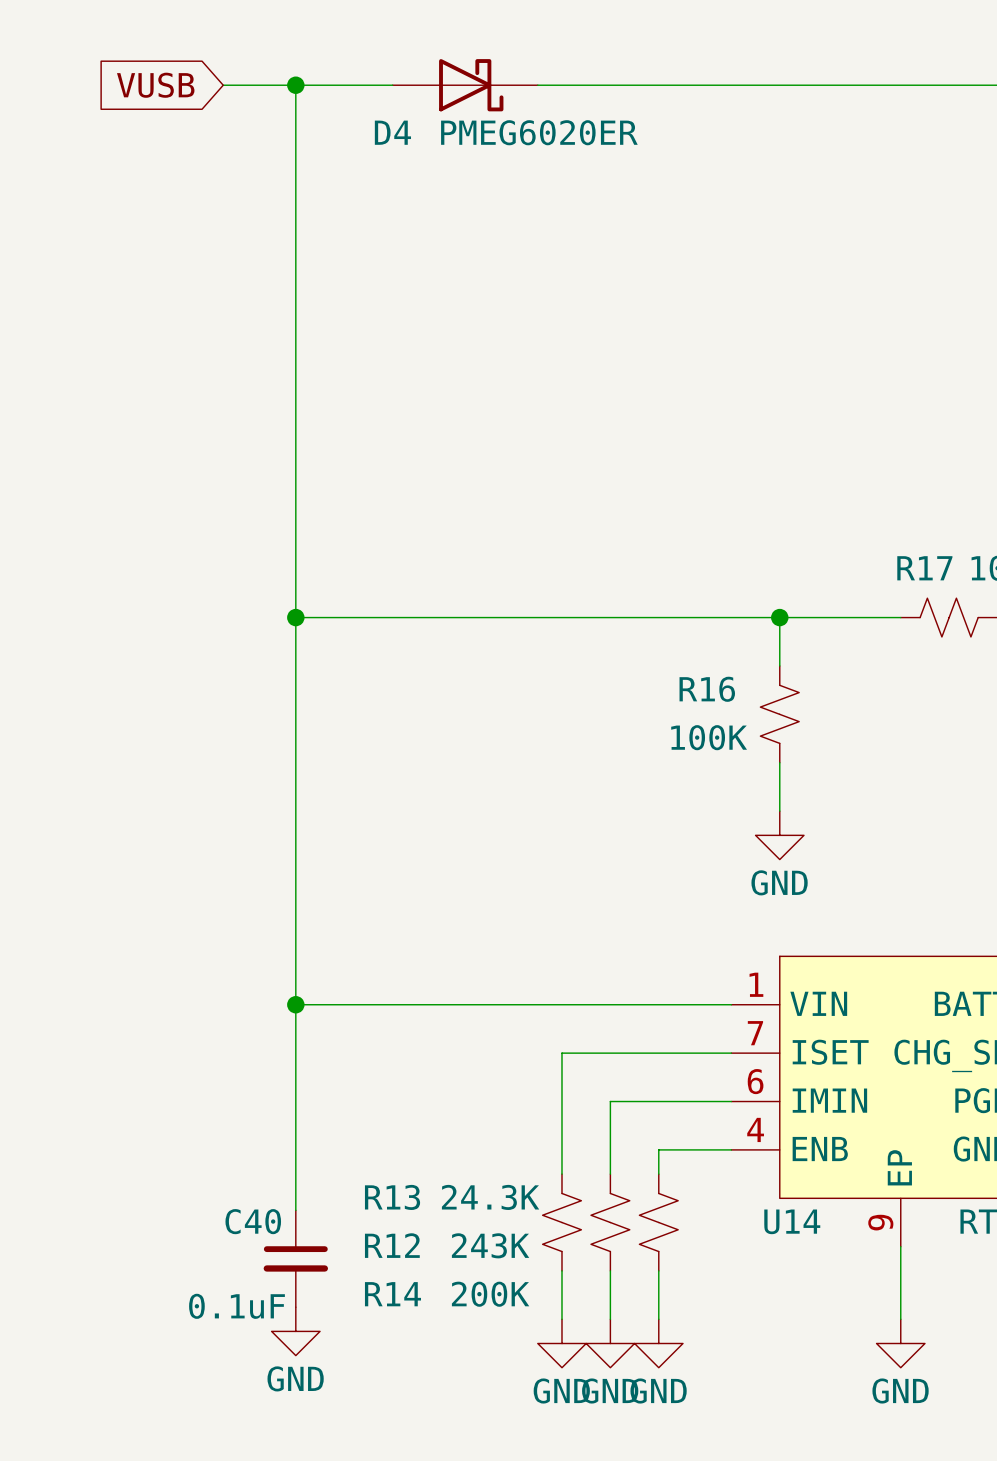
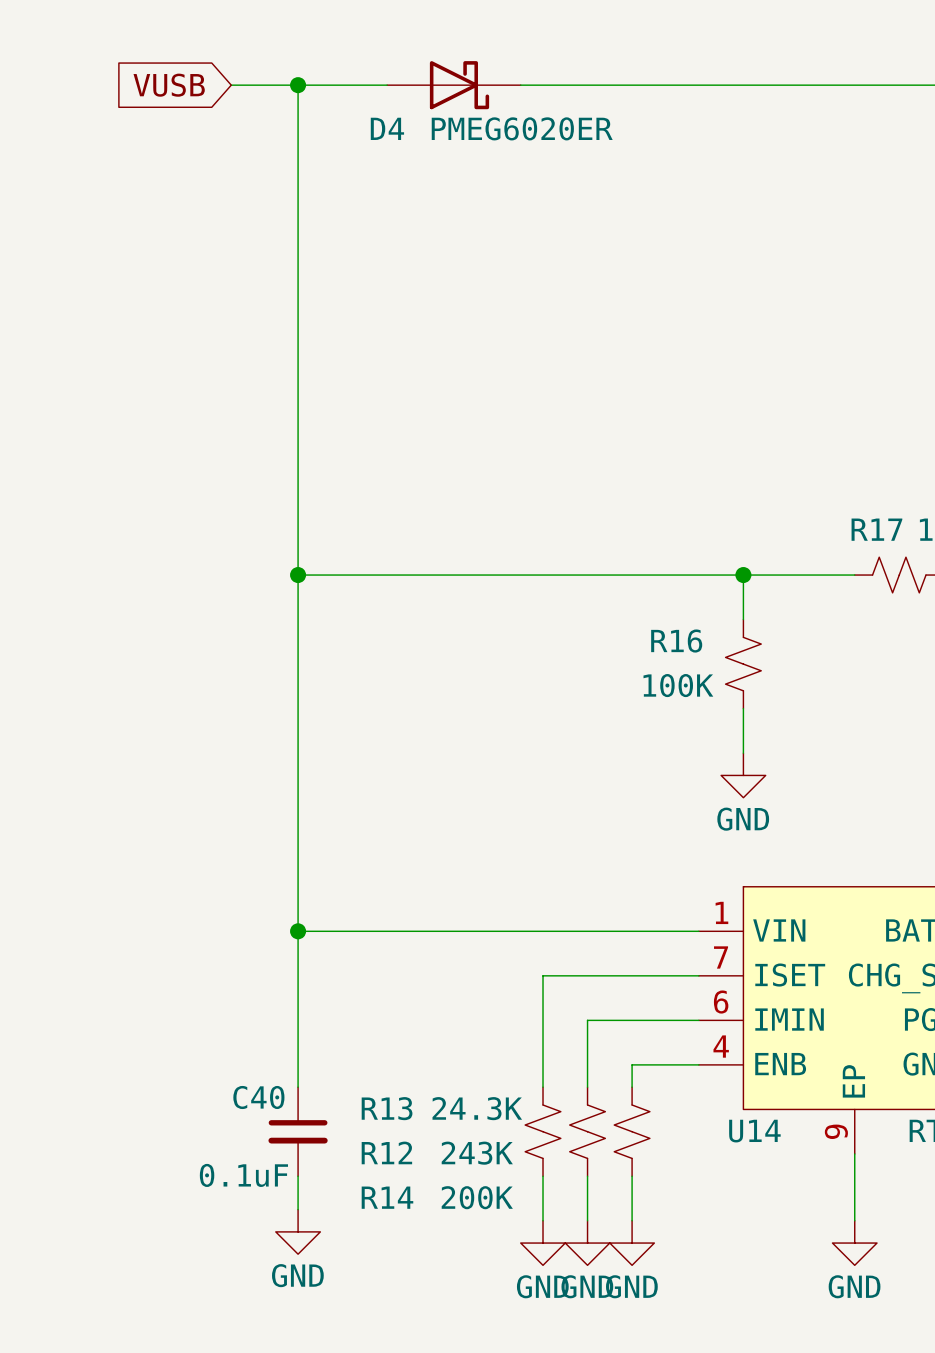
C40 position: (295, 1258) -> (298, 1131)

